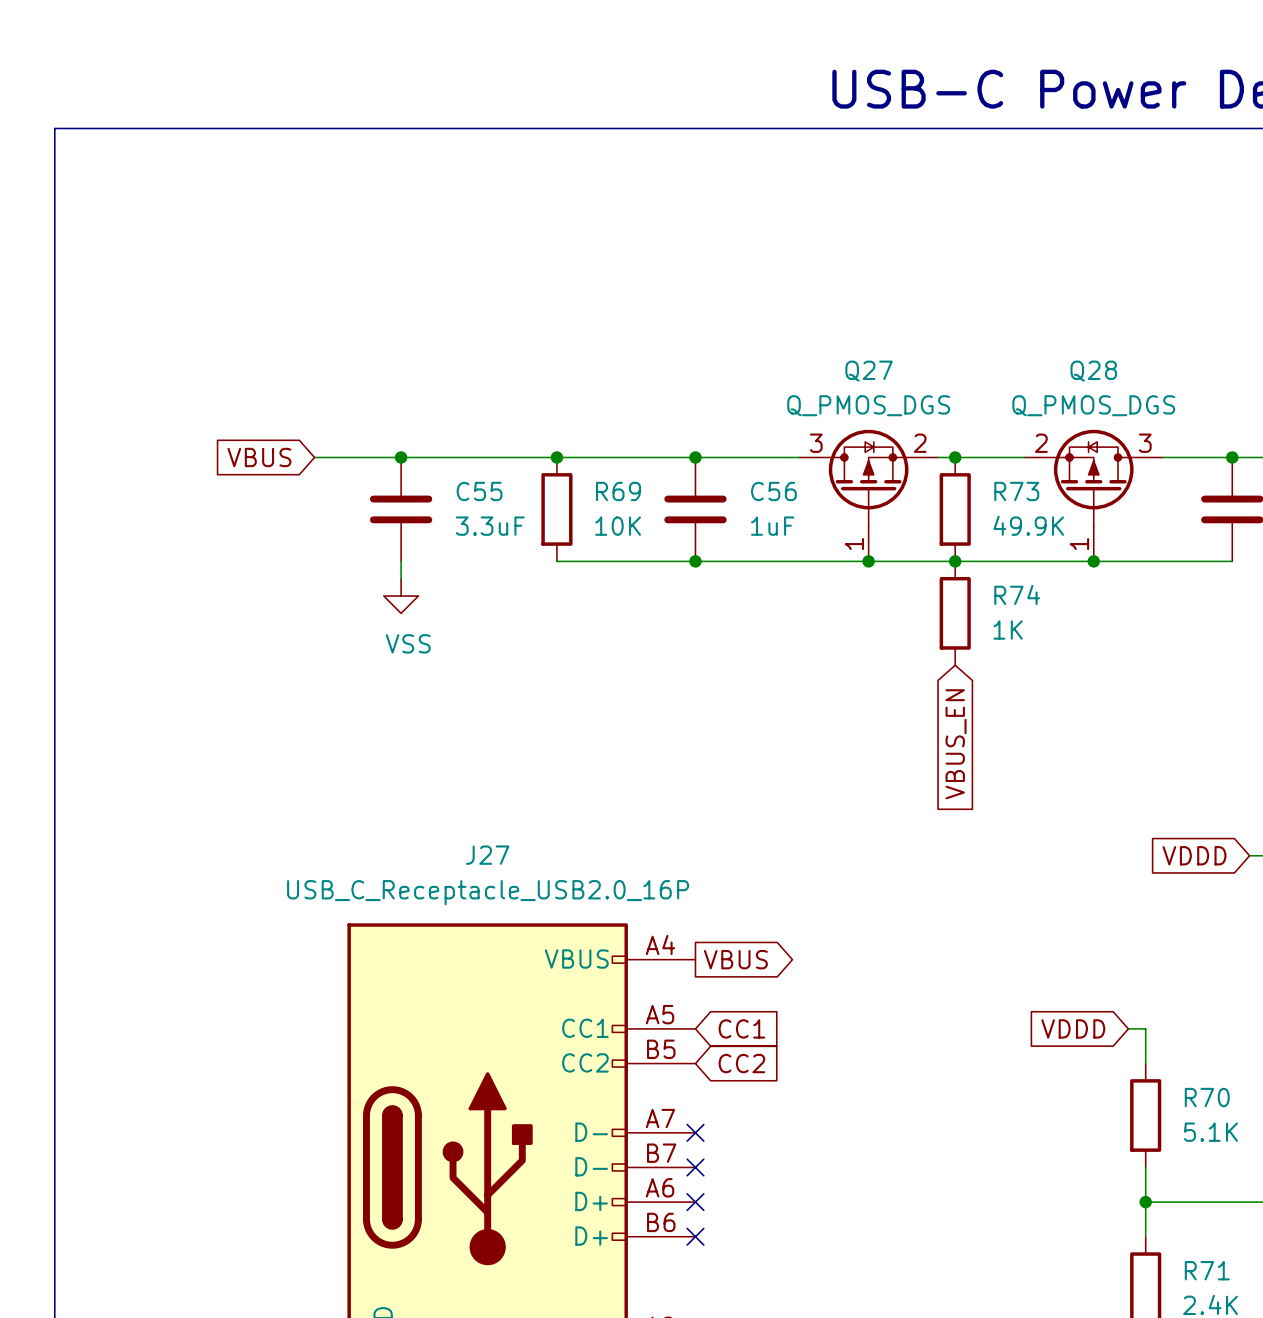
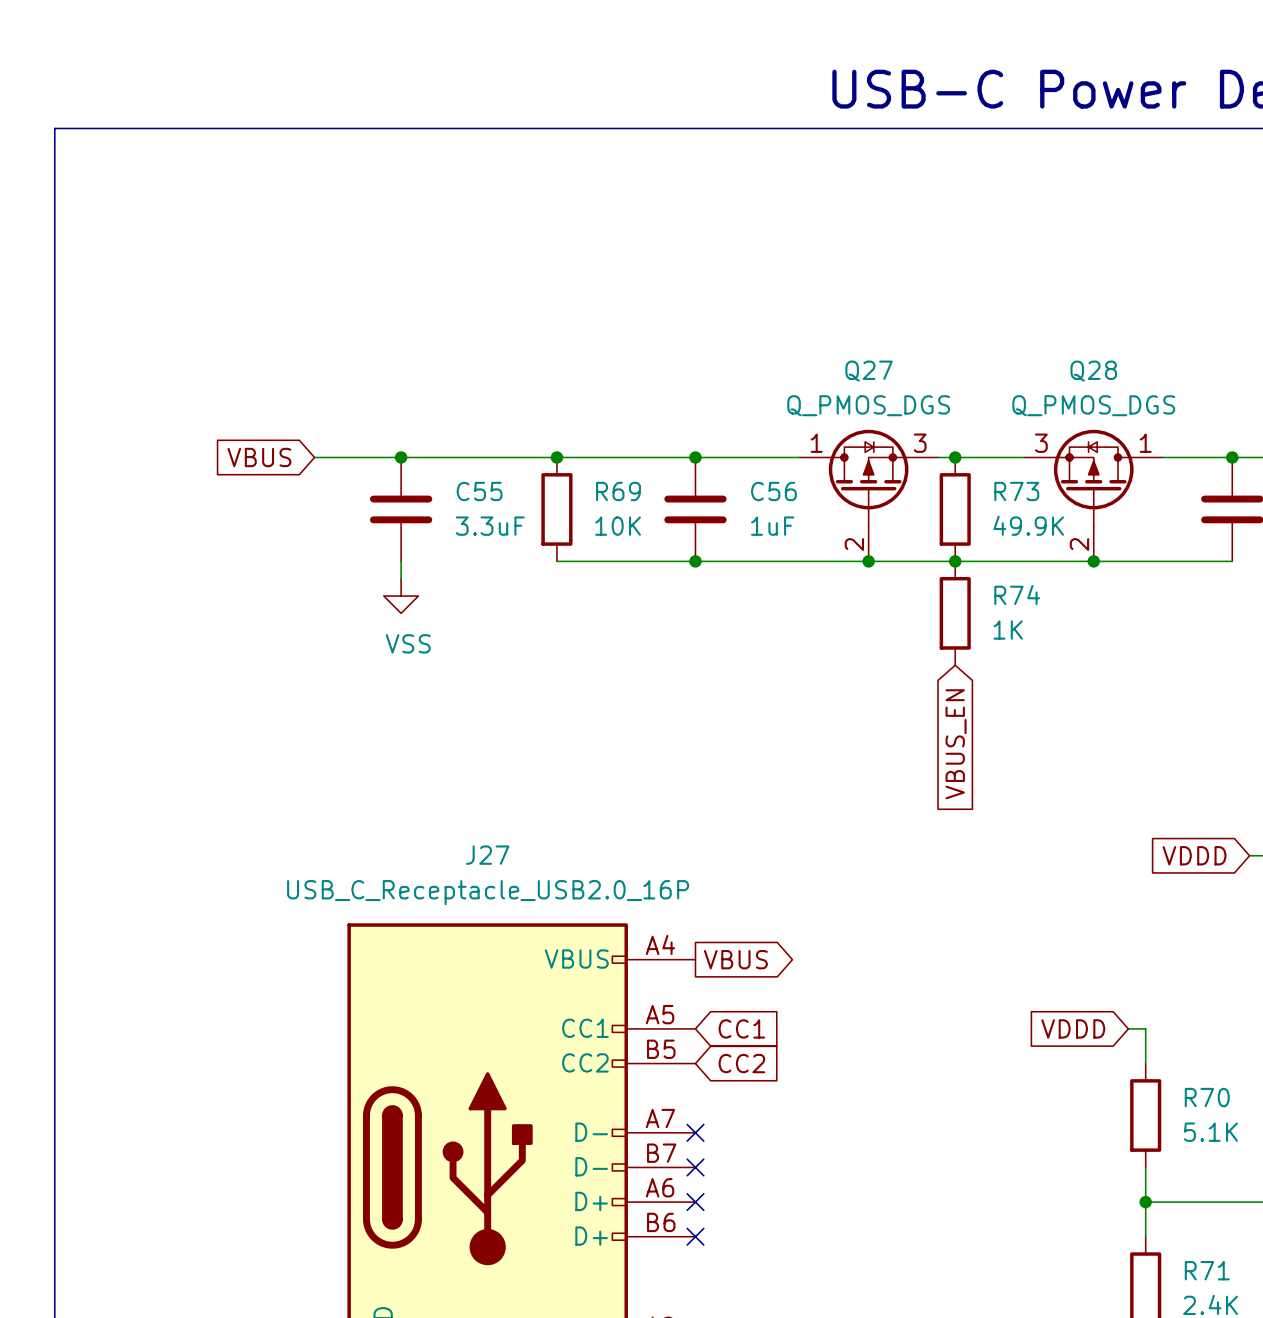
Q27 pin number: 3 (816, 443) -> 1 (816, 443)
Q27 pin number: 2 (920, 443) -> 3 (920, 443)
Q28 pin number: 2 (1041, 443) -> 3 (1041, 443)
Q28 pin number: 3 (1145, 443) -> 1 (1145, 443)
Q27 pin number: 1 (854, 544) -> 2 (854, 544)
Q28 pin number: 1 (1079, 544) -> 2 (1079, 544)

